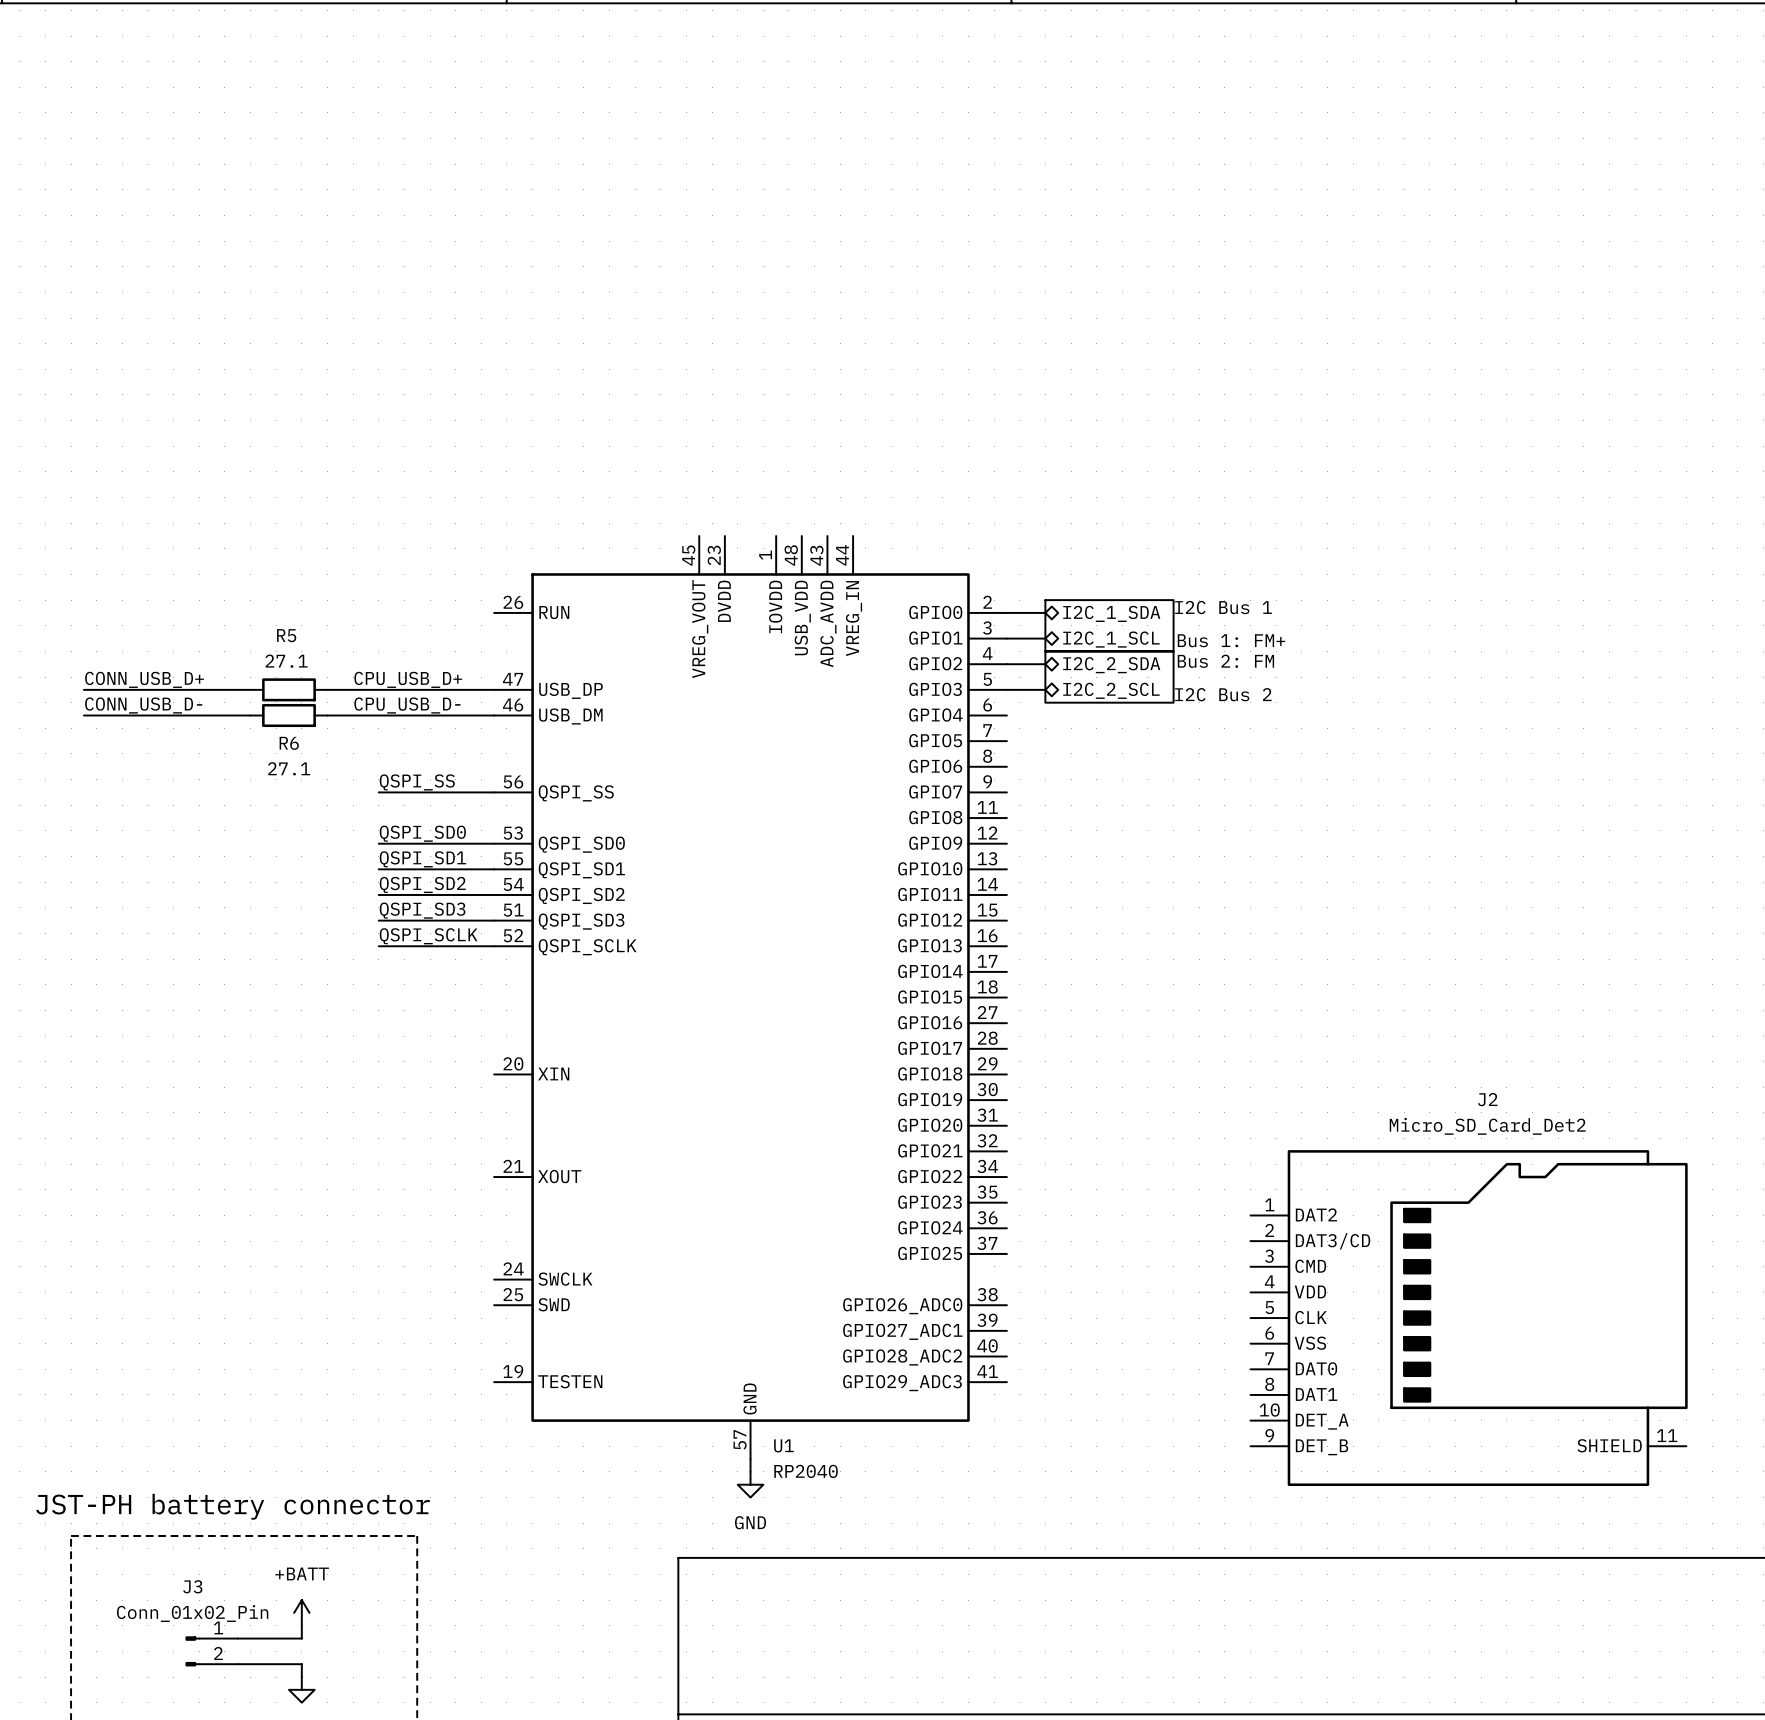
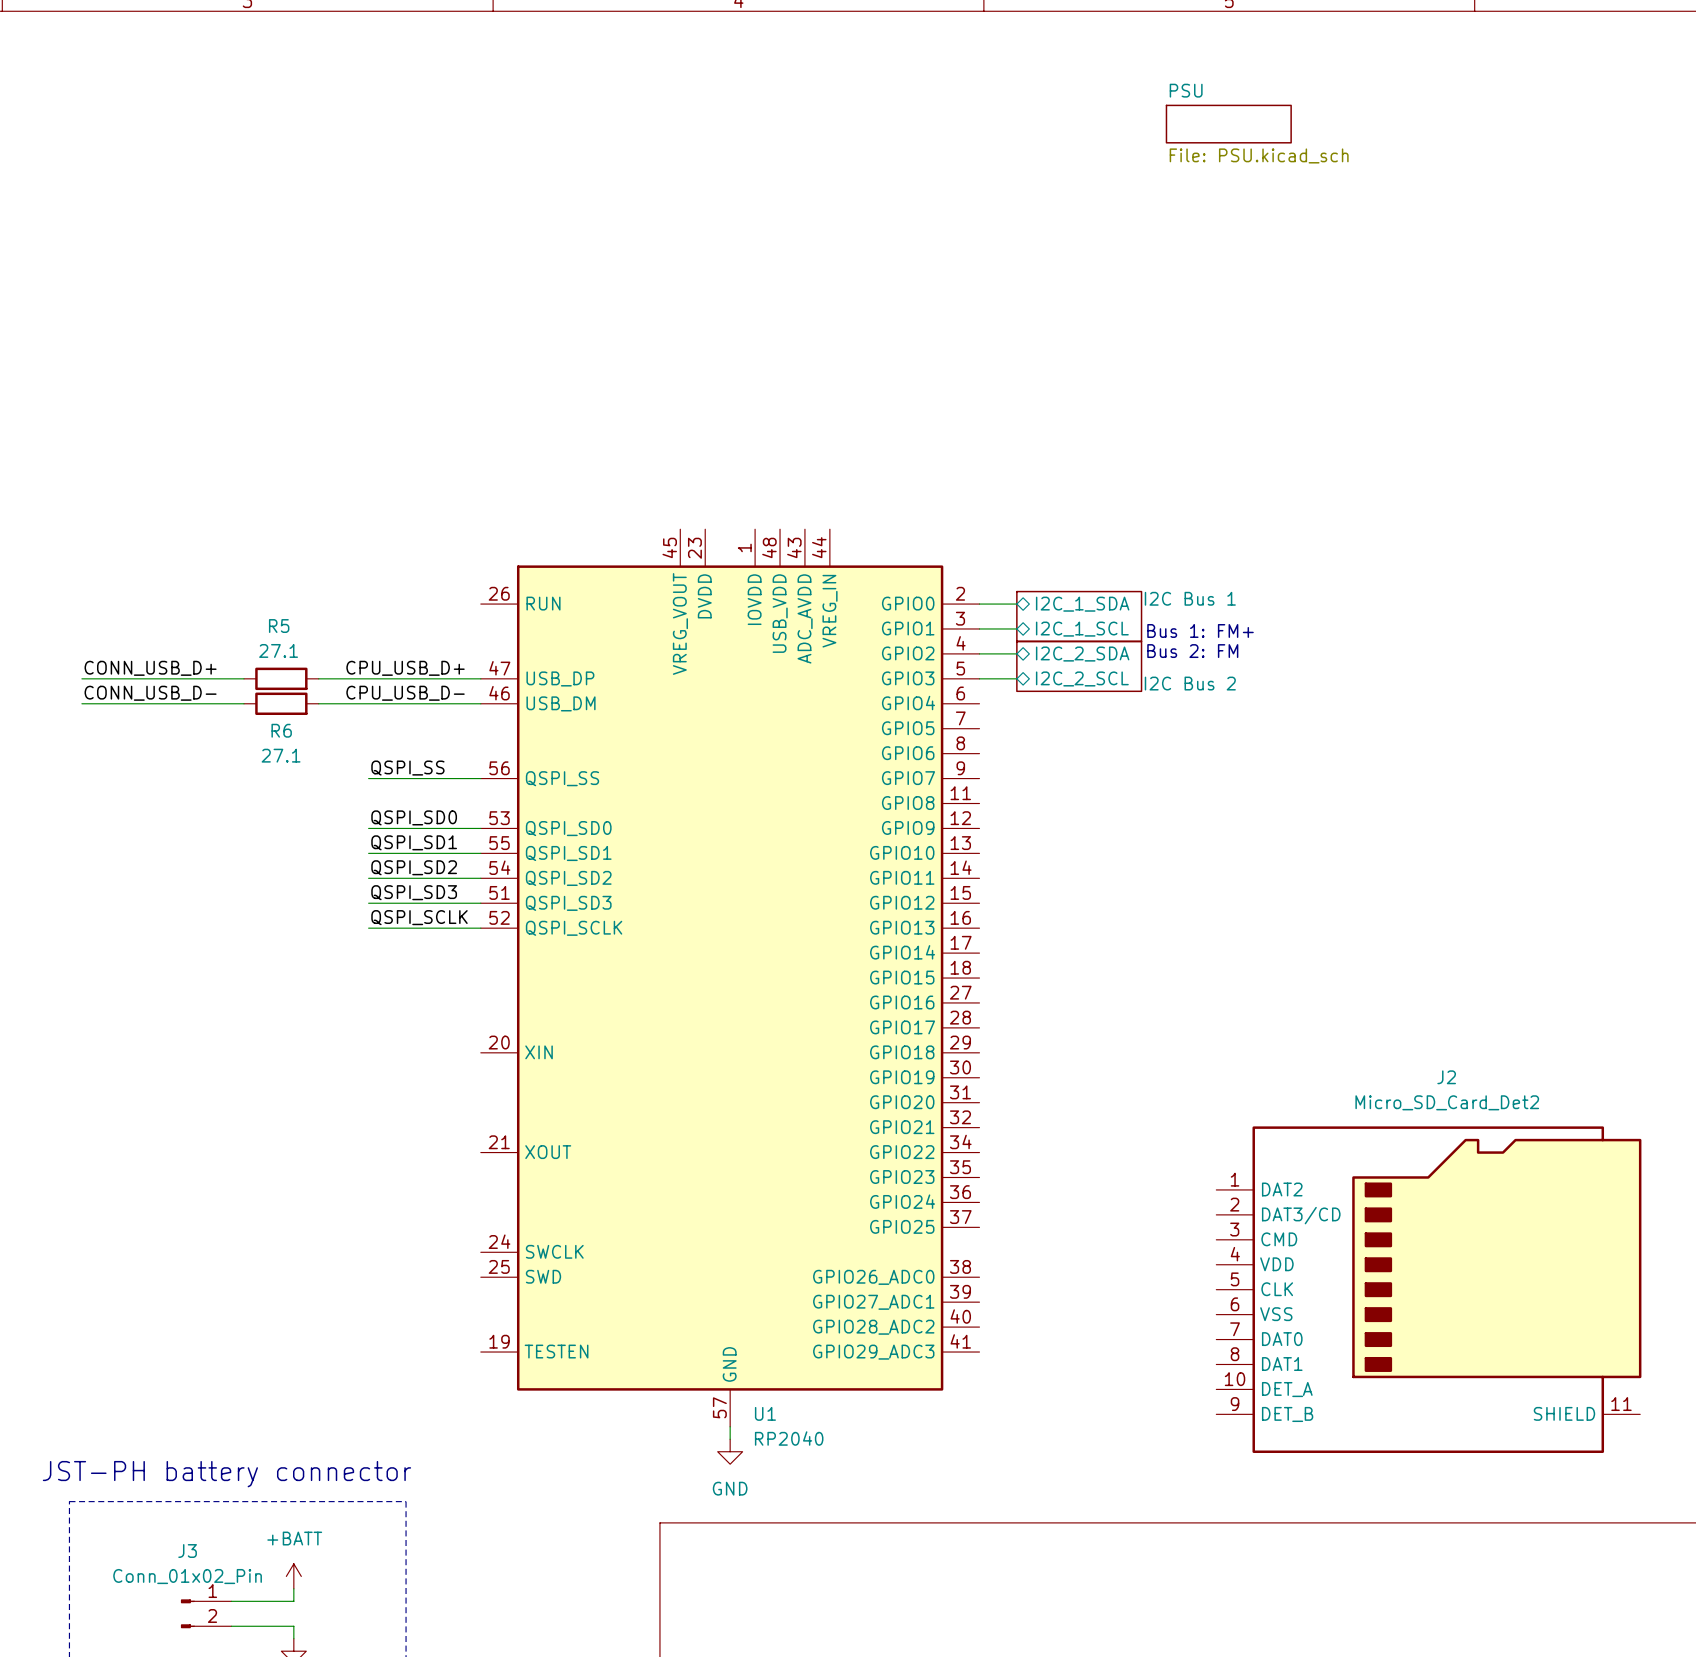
sheet PSU: none -> File: PSU.kicad_sch (1228, 124)

